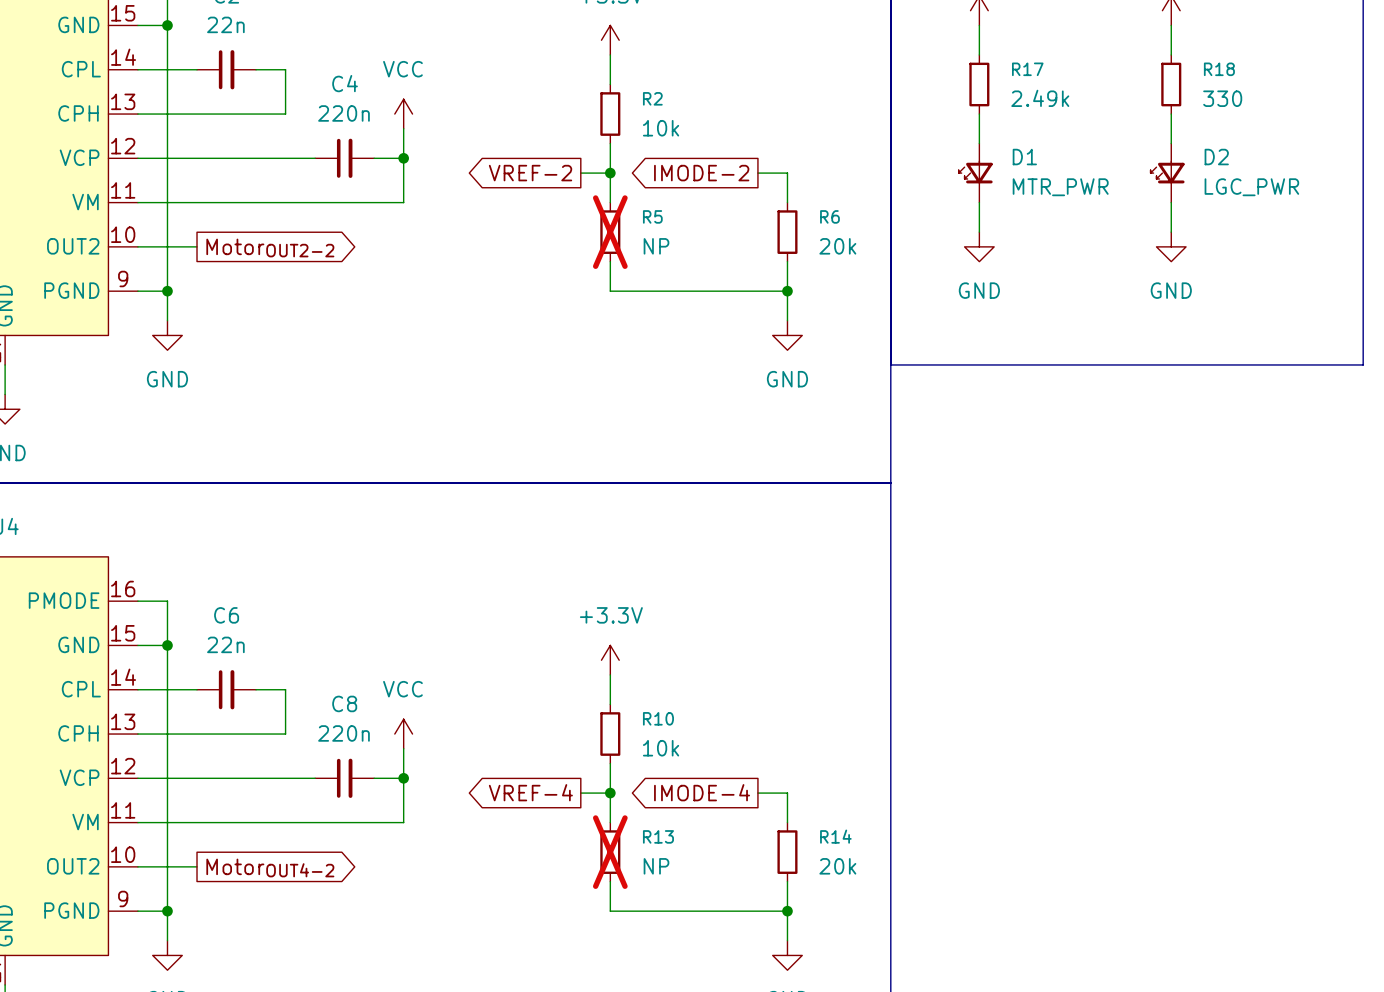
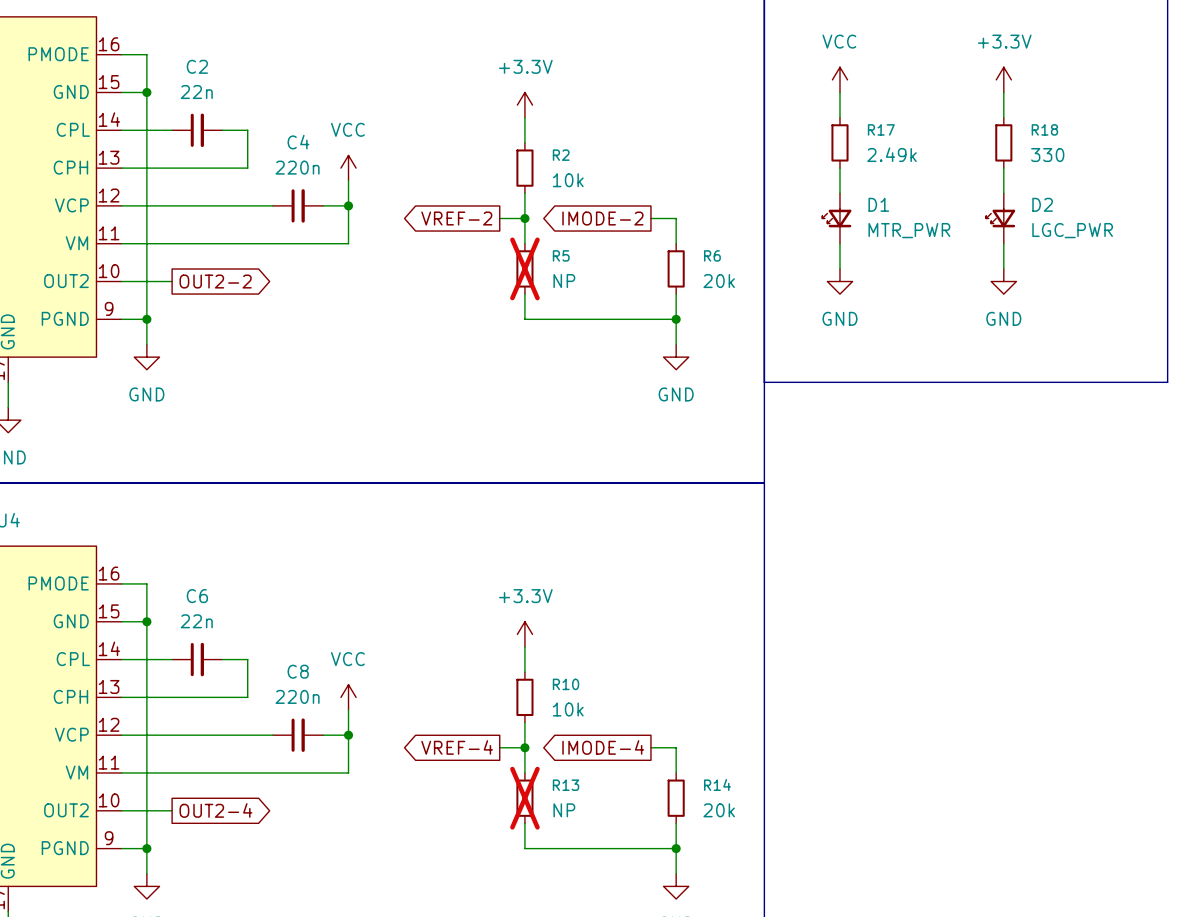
global label: MotorOUT2-2 (270, 247) -> OUT2-2 (215, 281)
global label: MotorOUT4-2 (270, 867) -> OUT2-4 (215, 810)

